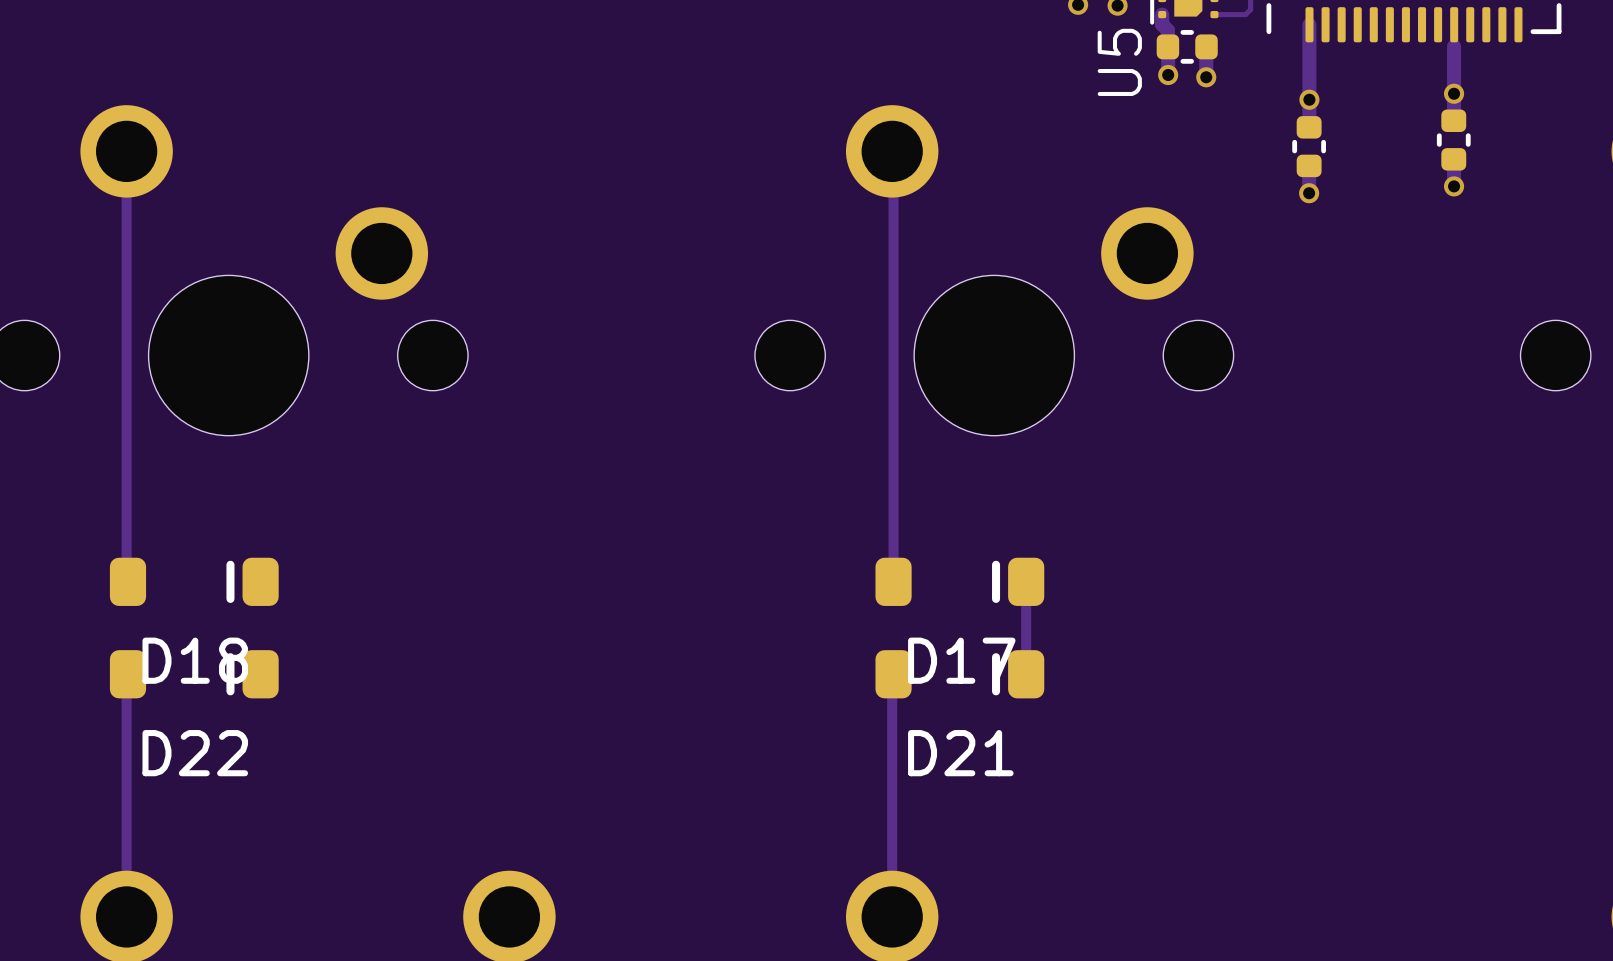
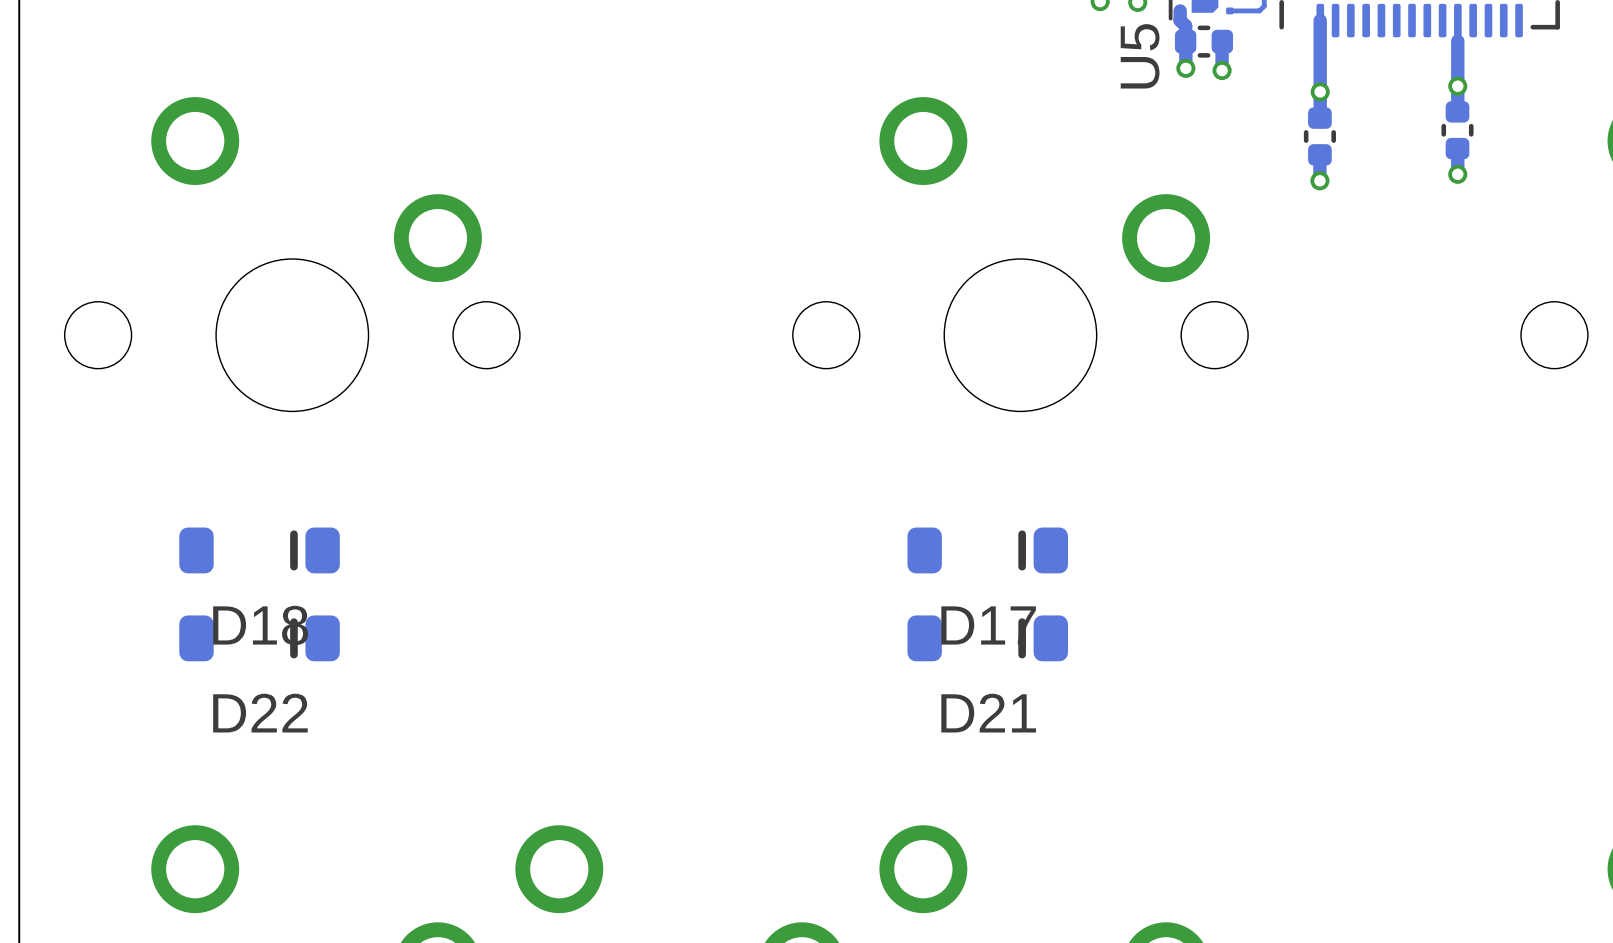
track: (126, 151) (127, 581) -> none
track: (892, 151) (893, 581) -> none
track: (1026, 581) (1026, 674) -> none
track: (127, 674) (126, 916) -> none
track: (893, 674) (892, 916) -> none

